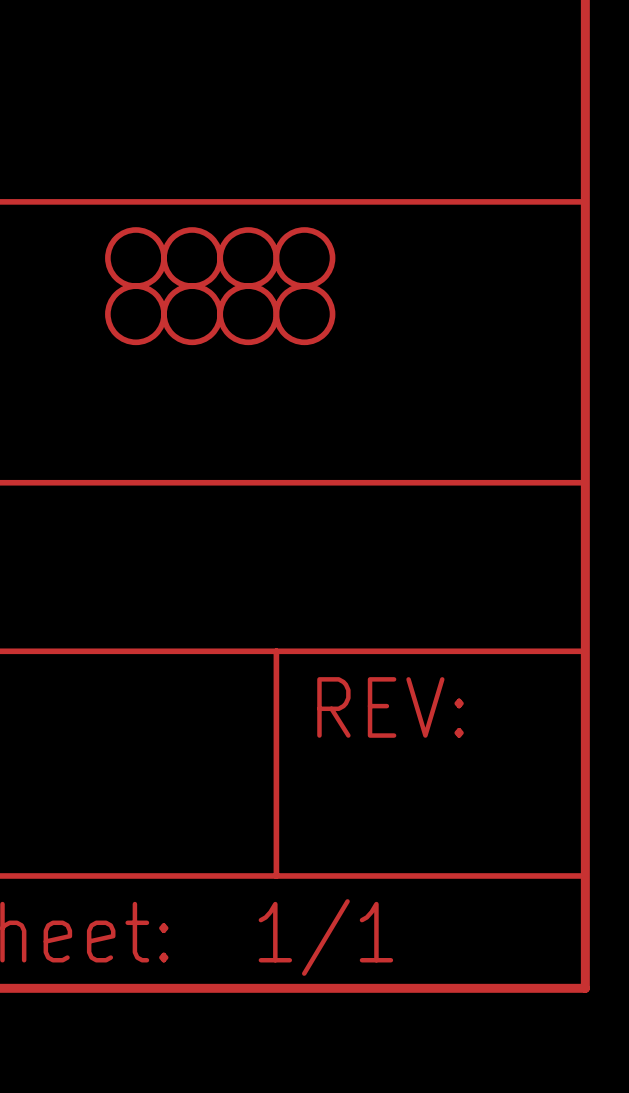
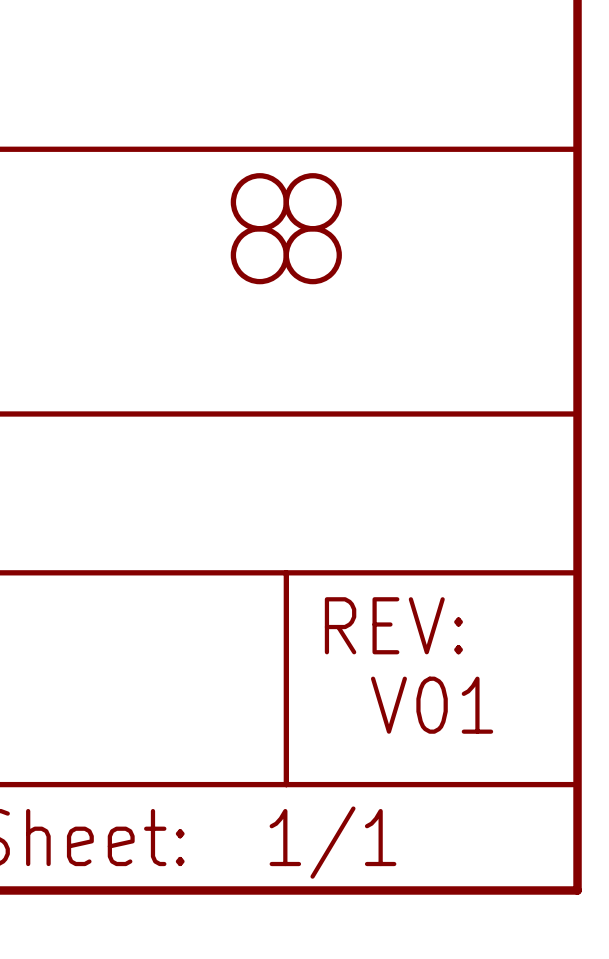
part: (135, 258) -> none
part: (192, 258) -> none
part: (135, 314) -> none
part: (192, 314) -> none
text: none -> V01 (432, 705)

